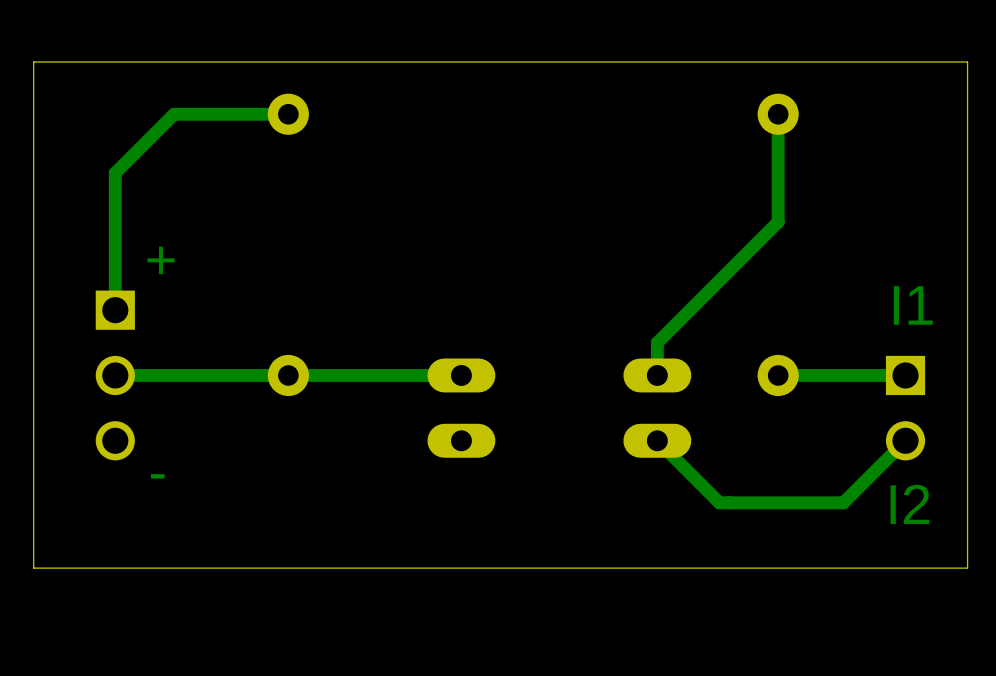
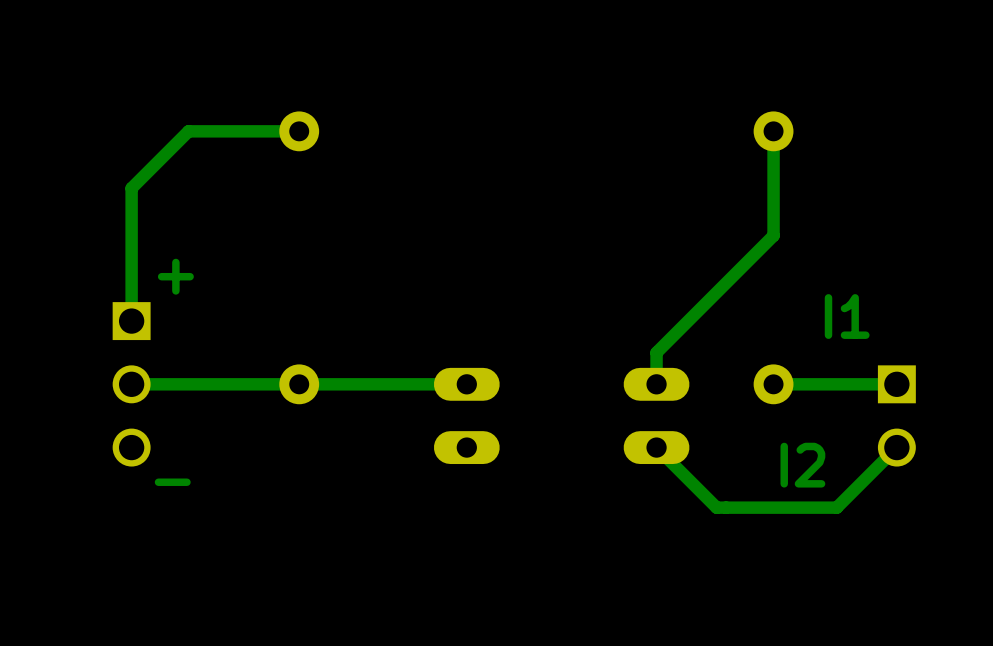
board edge: (967, 62) (967, 568) (33, 568) (33, 62) (967, 62) -> none
text position: I1 (913, 305) -> I1 (847, 316)
text position: I2 (909, 504) -> I2 (802, 465)

